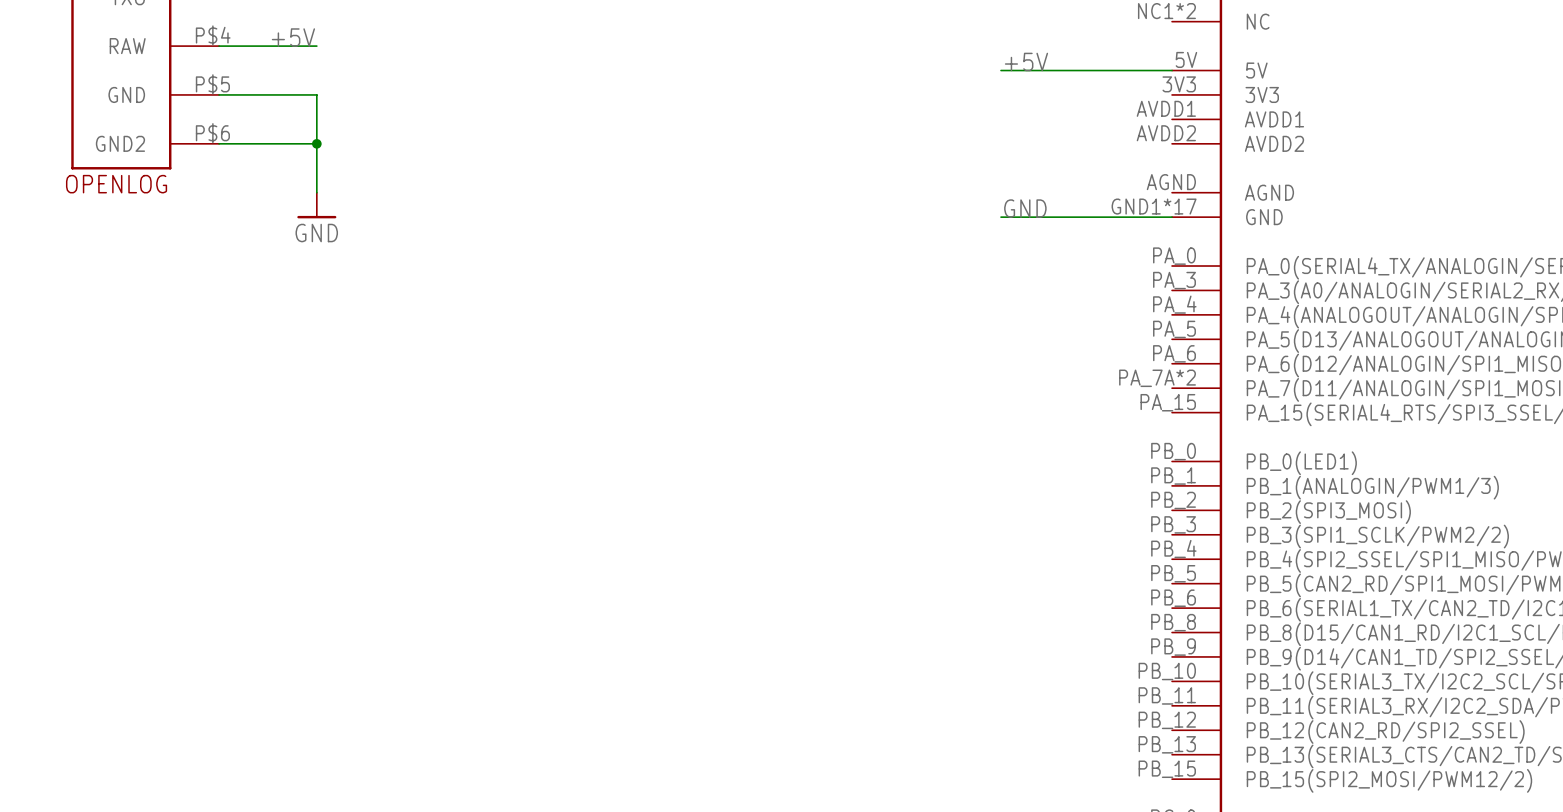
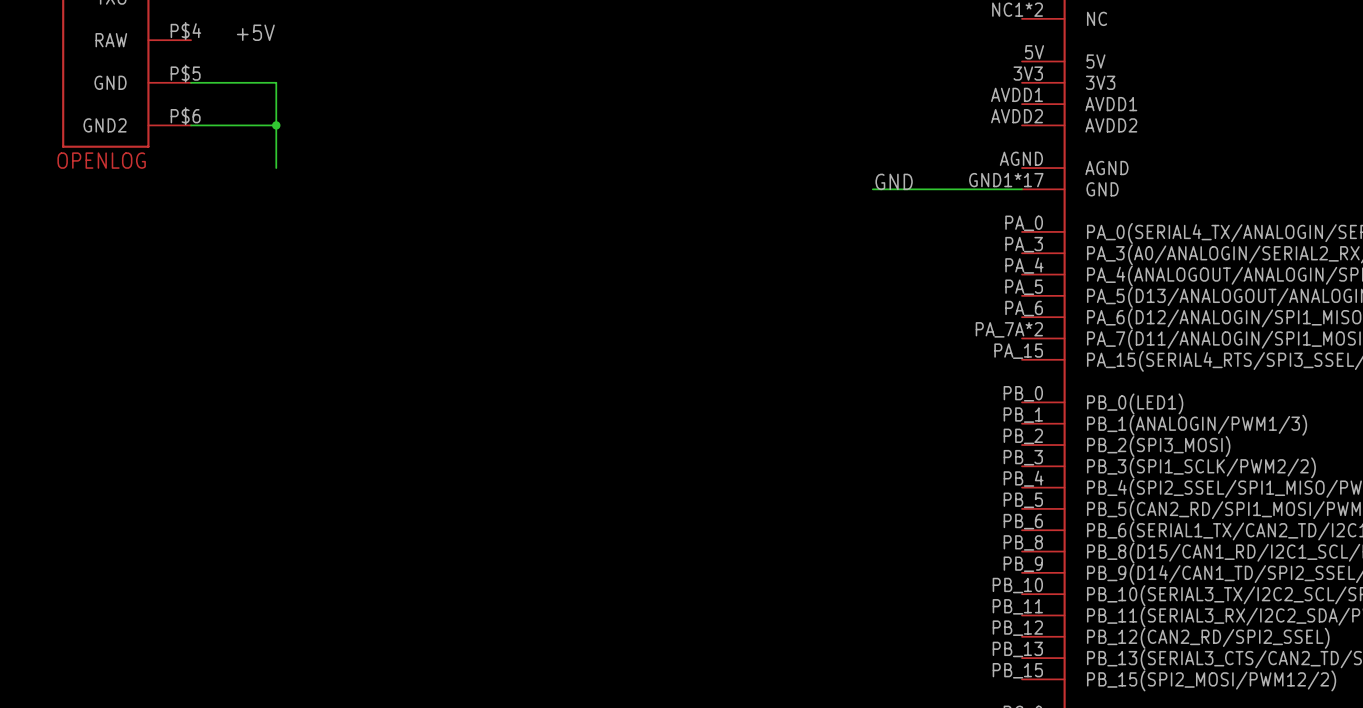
wire: (219, 46) (316, 46) -> none
label: +5V (1026, 61) -> none
wire: (1001, 70) (1172, 70) -> none
power symbol: GND (316, 205) -> none

